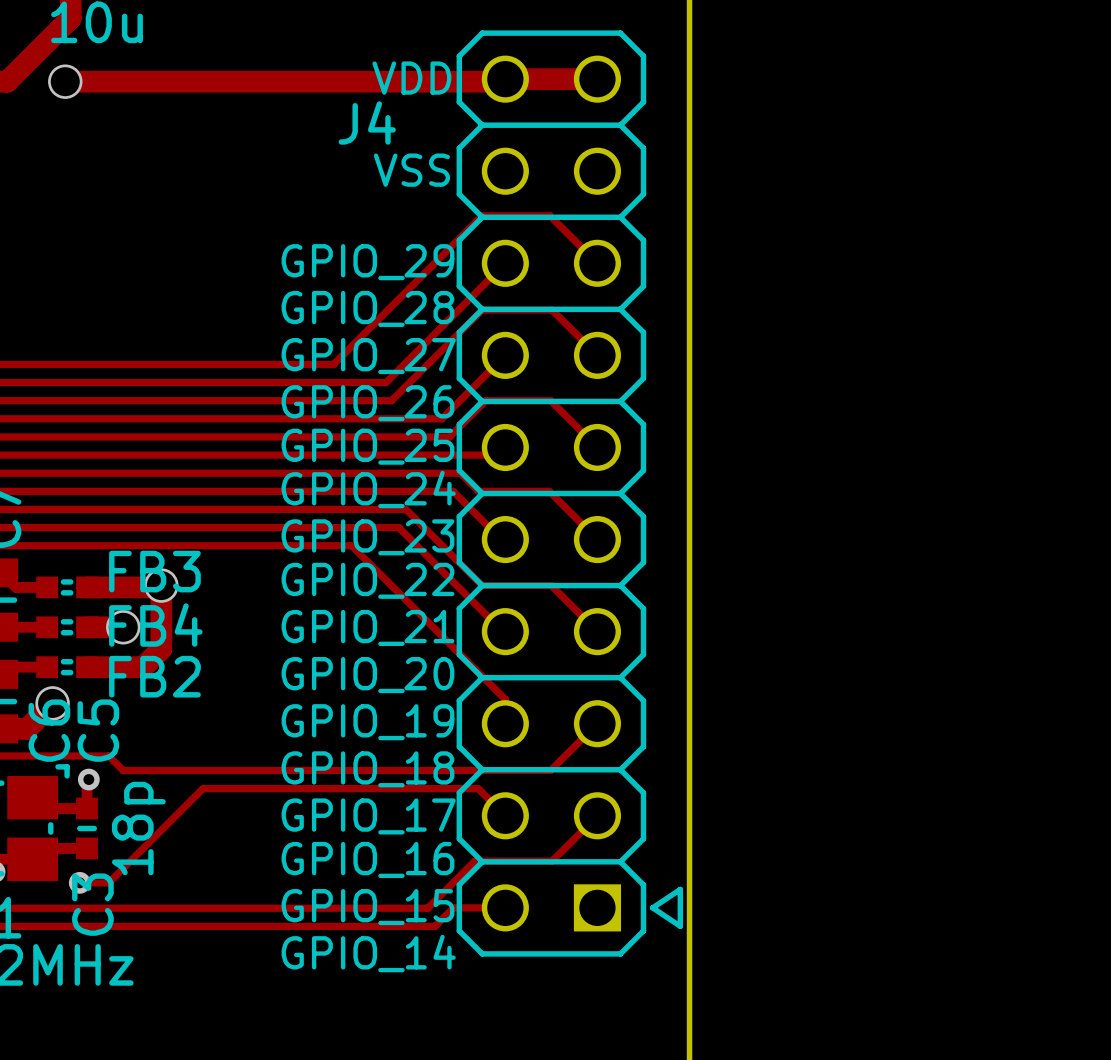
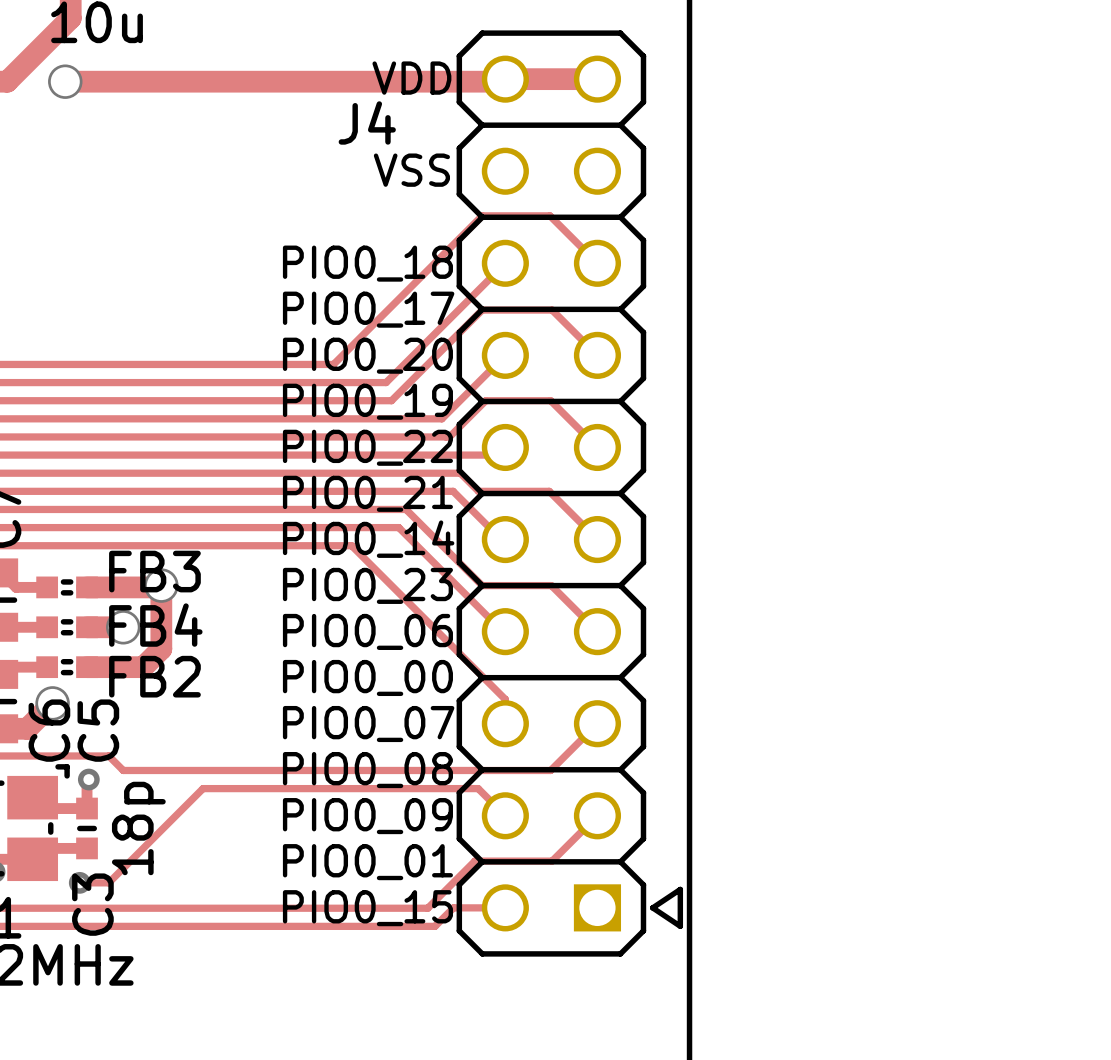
J4 footprint: [456, 30, 684, 957] -> [456, 30, 684, 957]

